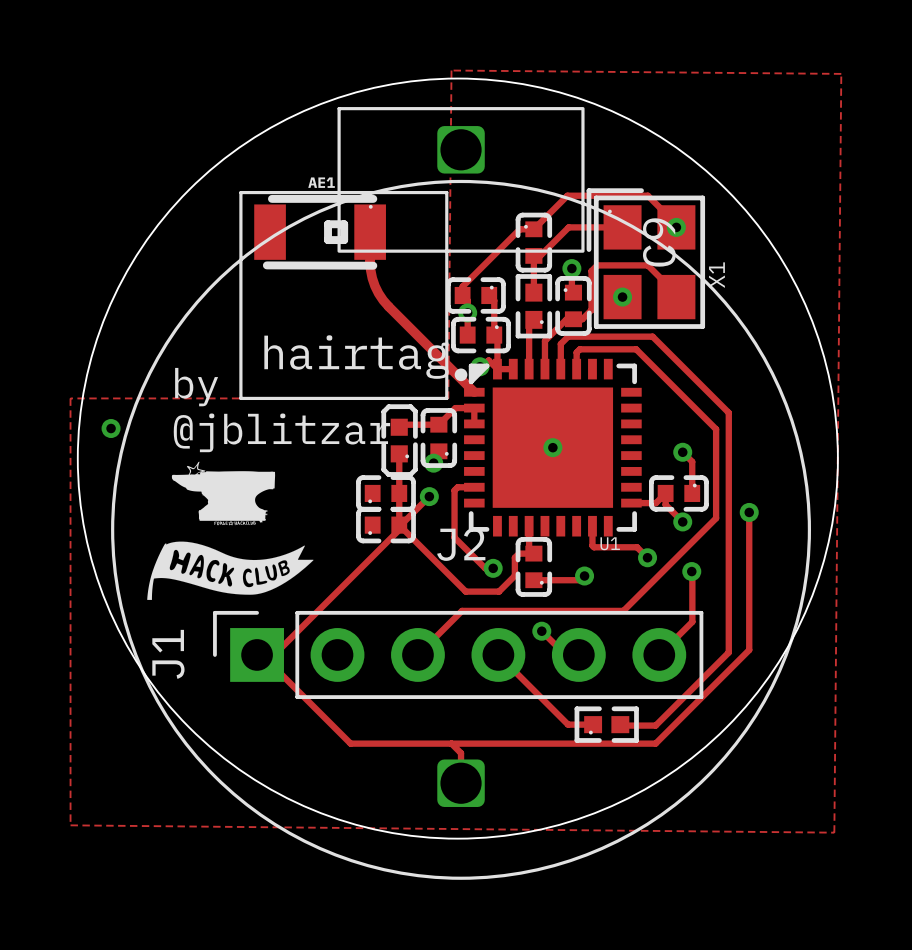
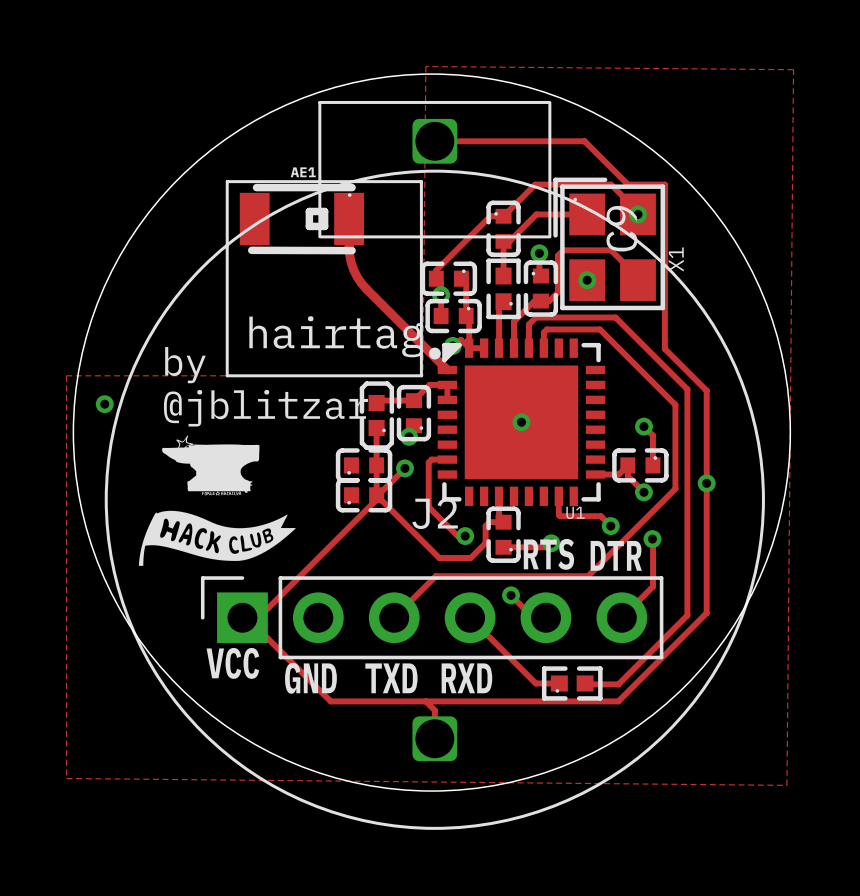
track: none -> (434, 141) (584, 141) (628, 184) (664, 184) (664, 348) (706, 390) (706, 483)
text: none -> RTS (548, 554)
text: none -> DTR (616, 555)
J1 name: J1 (168, 654) -> none
text: none -> VCC (232, 663)
text: none -> GND (310, 678)
text: none -> TXD (391, 678)
text: none -> RXD (466, 678)

